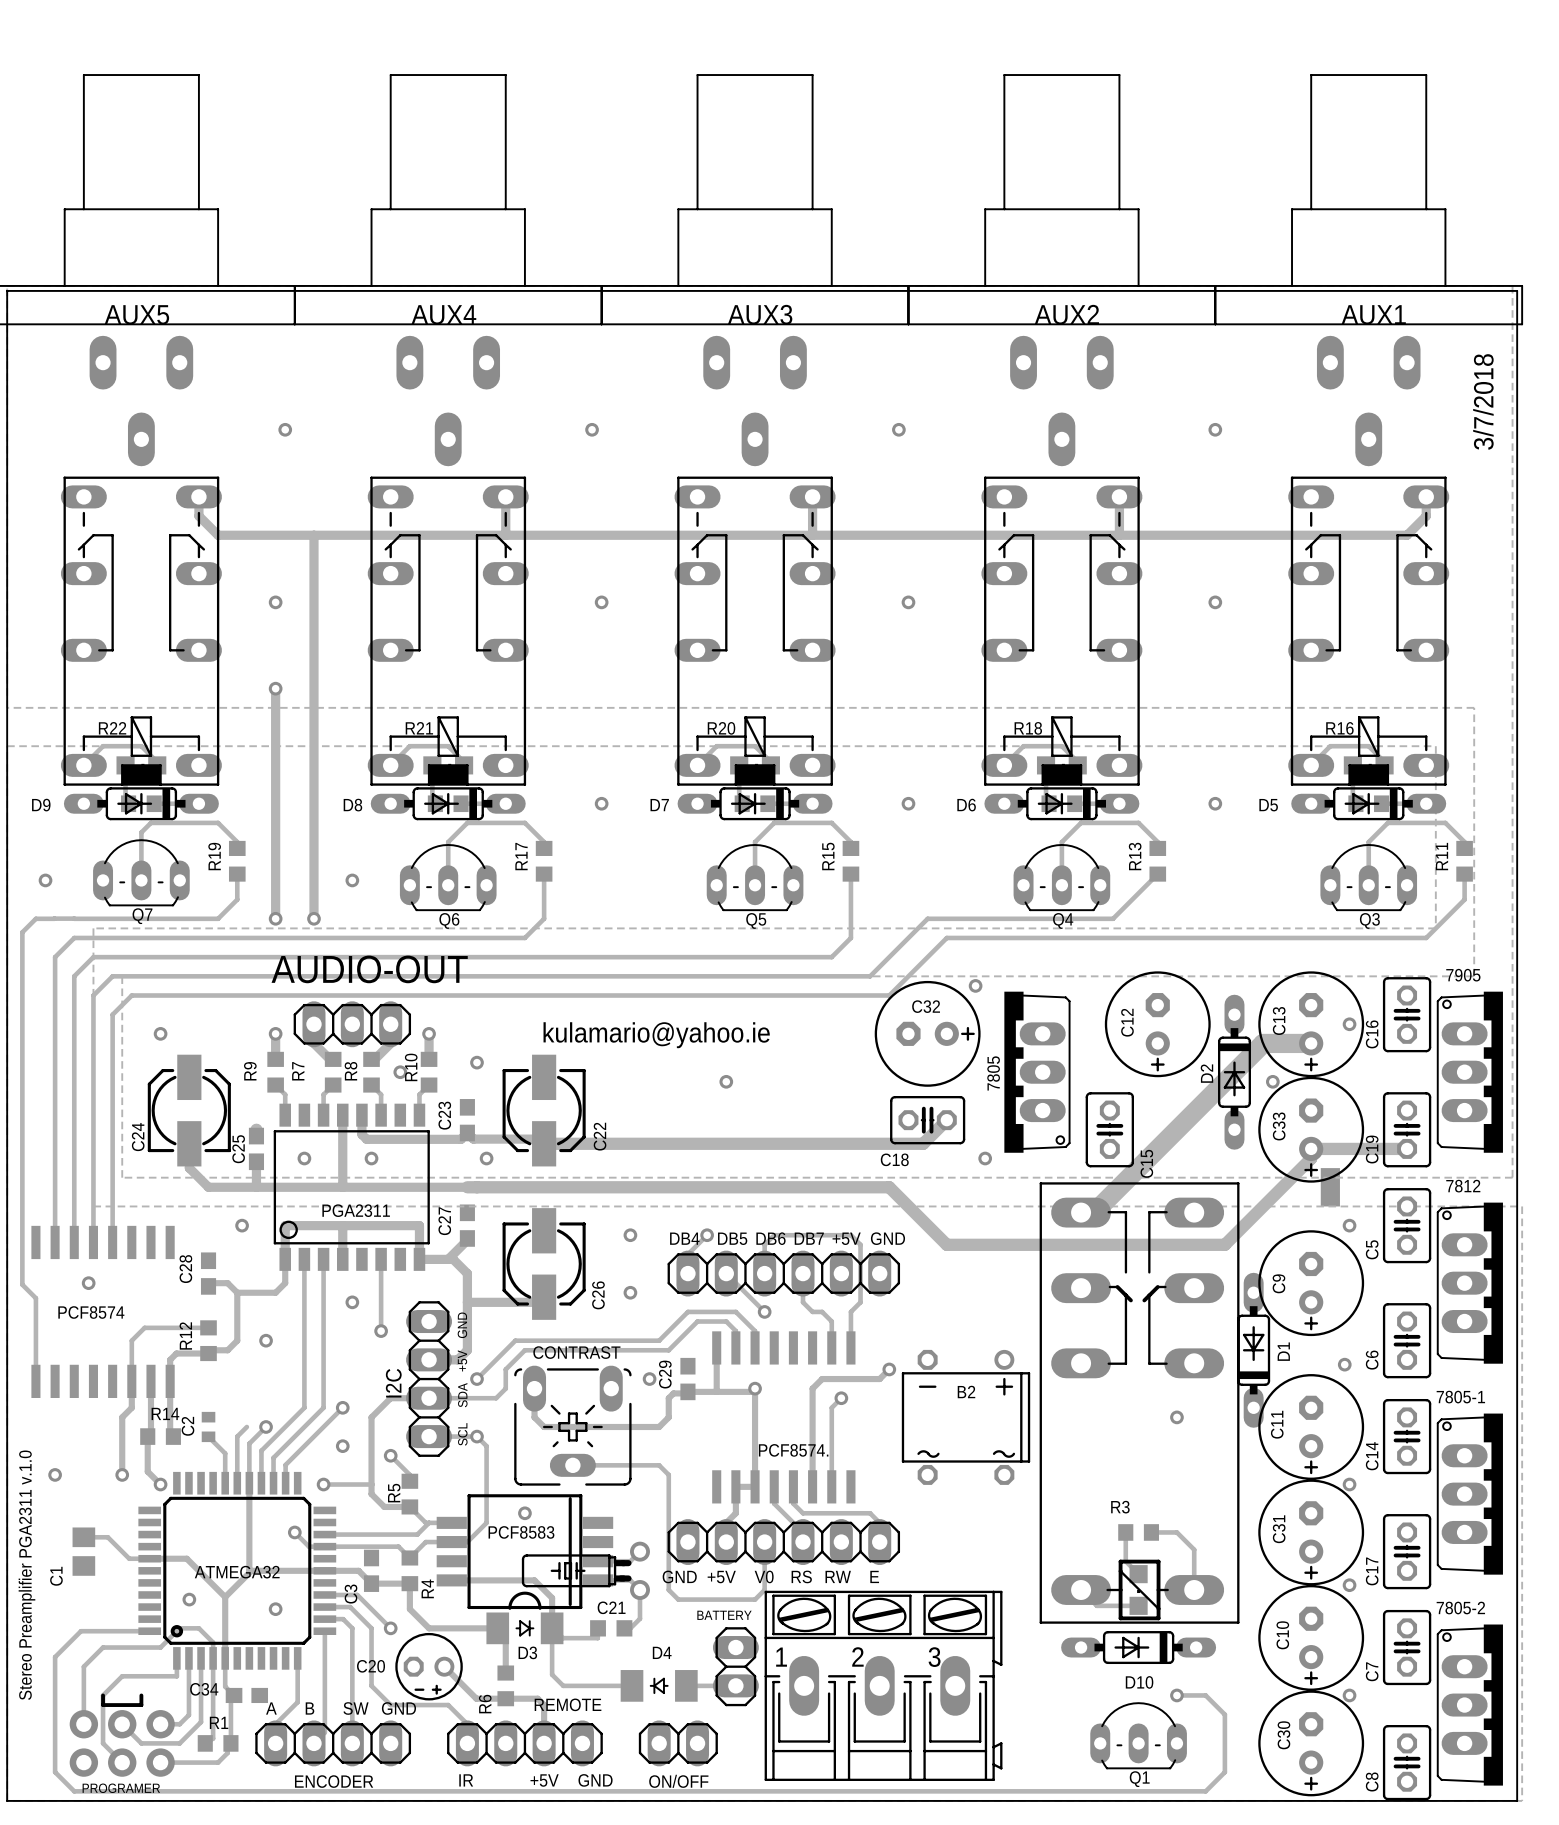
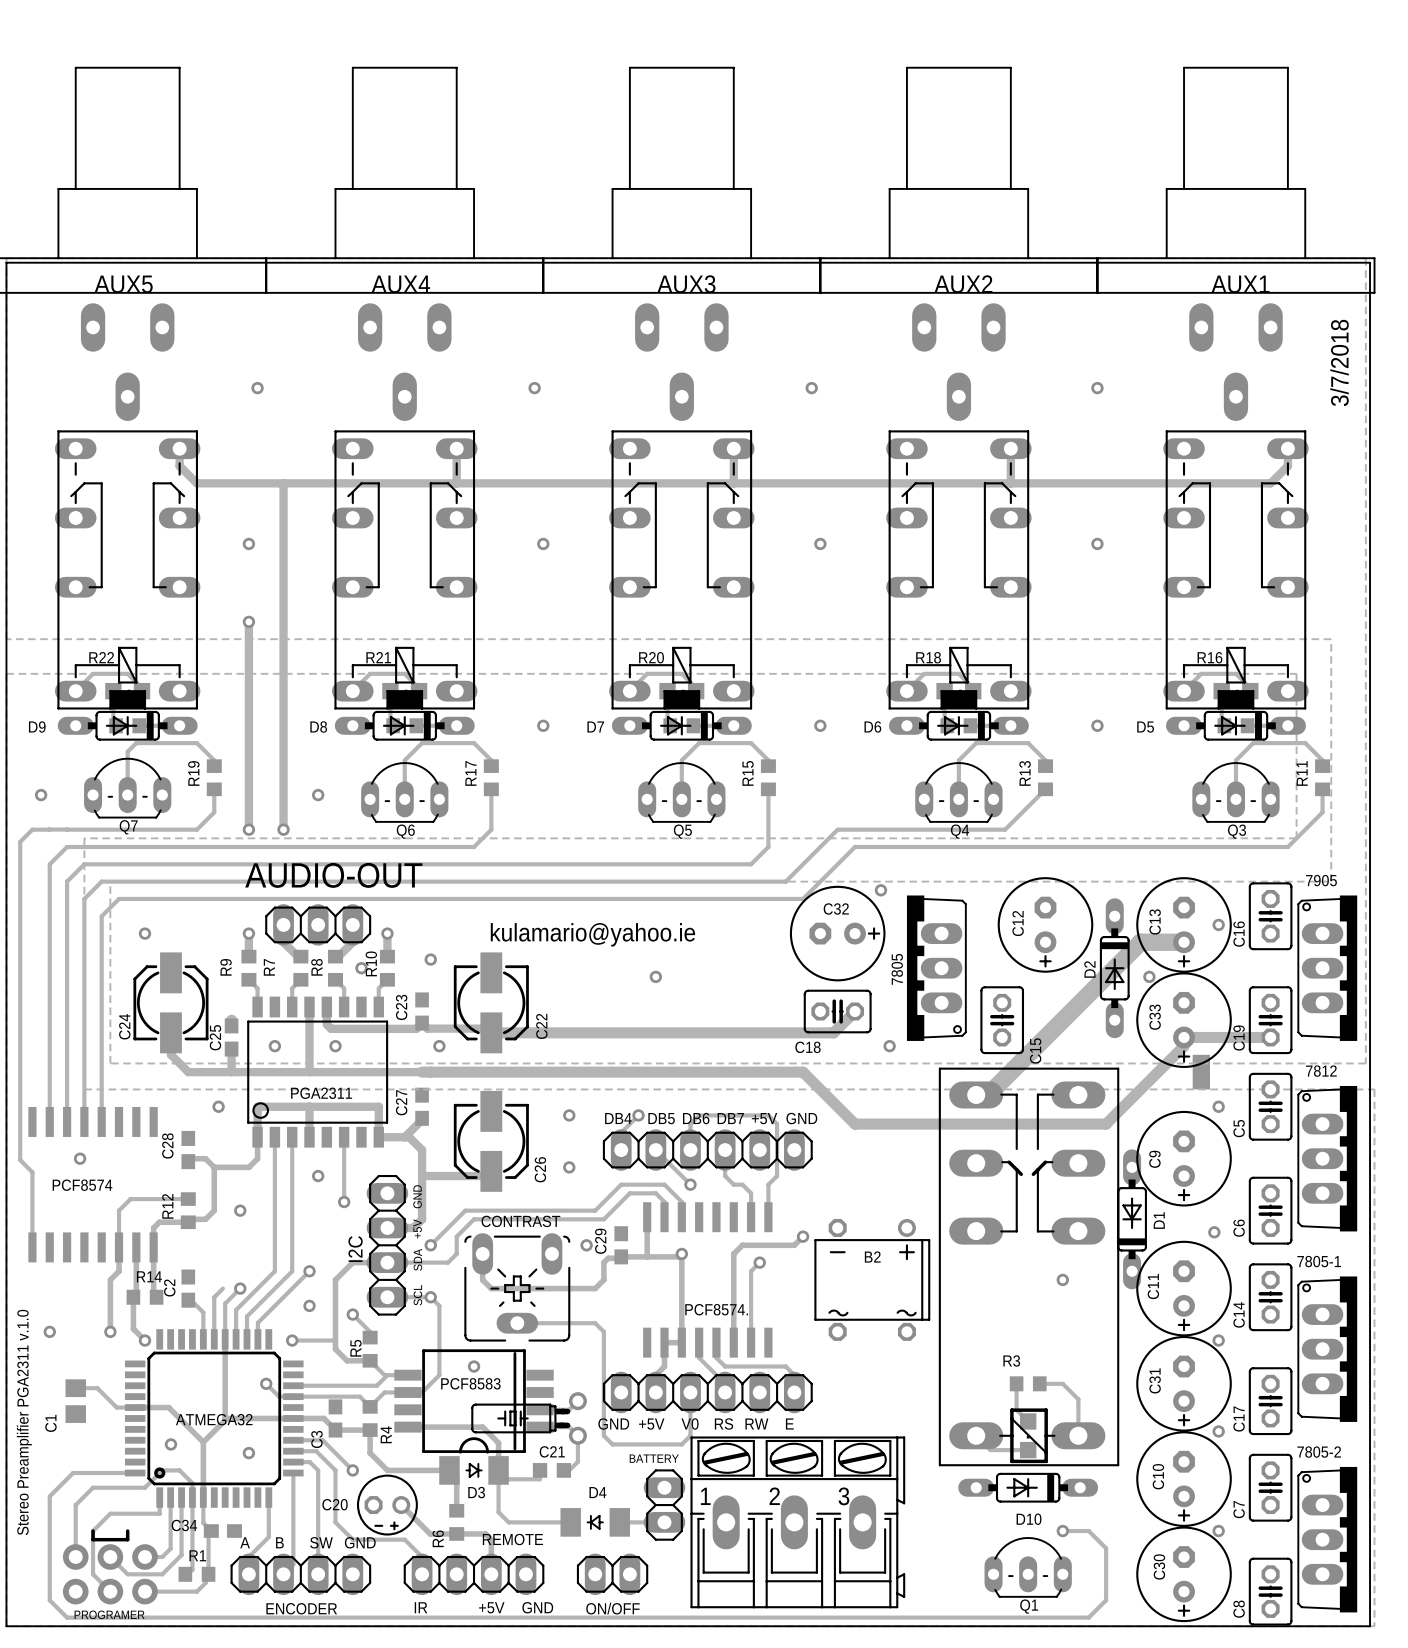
C2 footprint: [201, 1411, 216, 1443] -> [181, 1269, 196, 1308]

